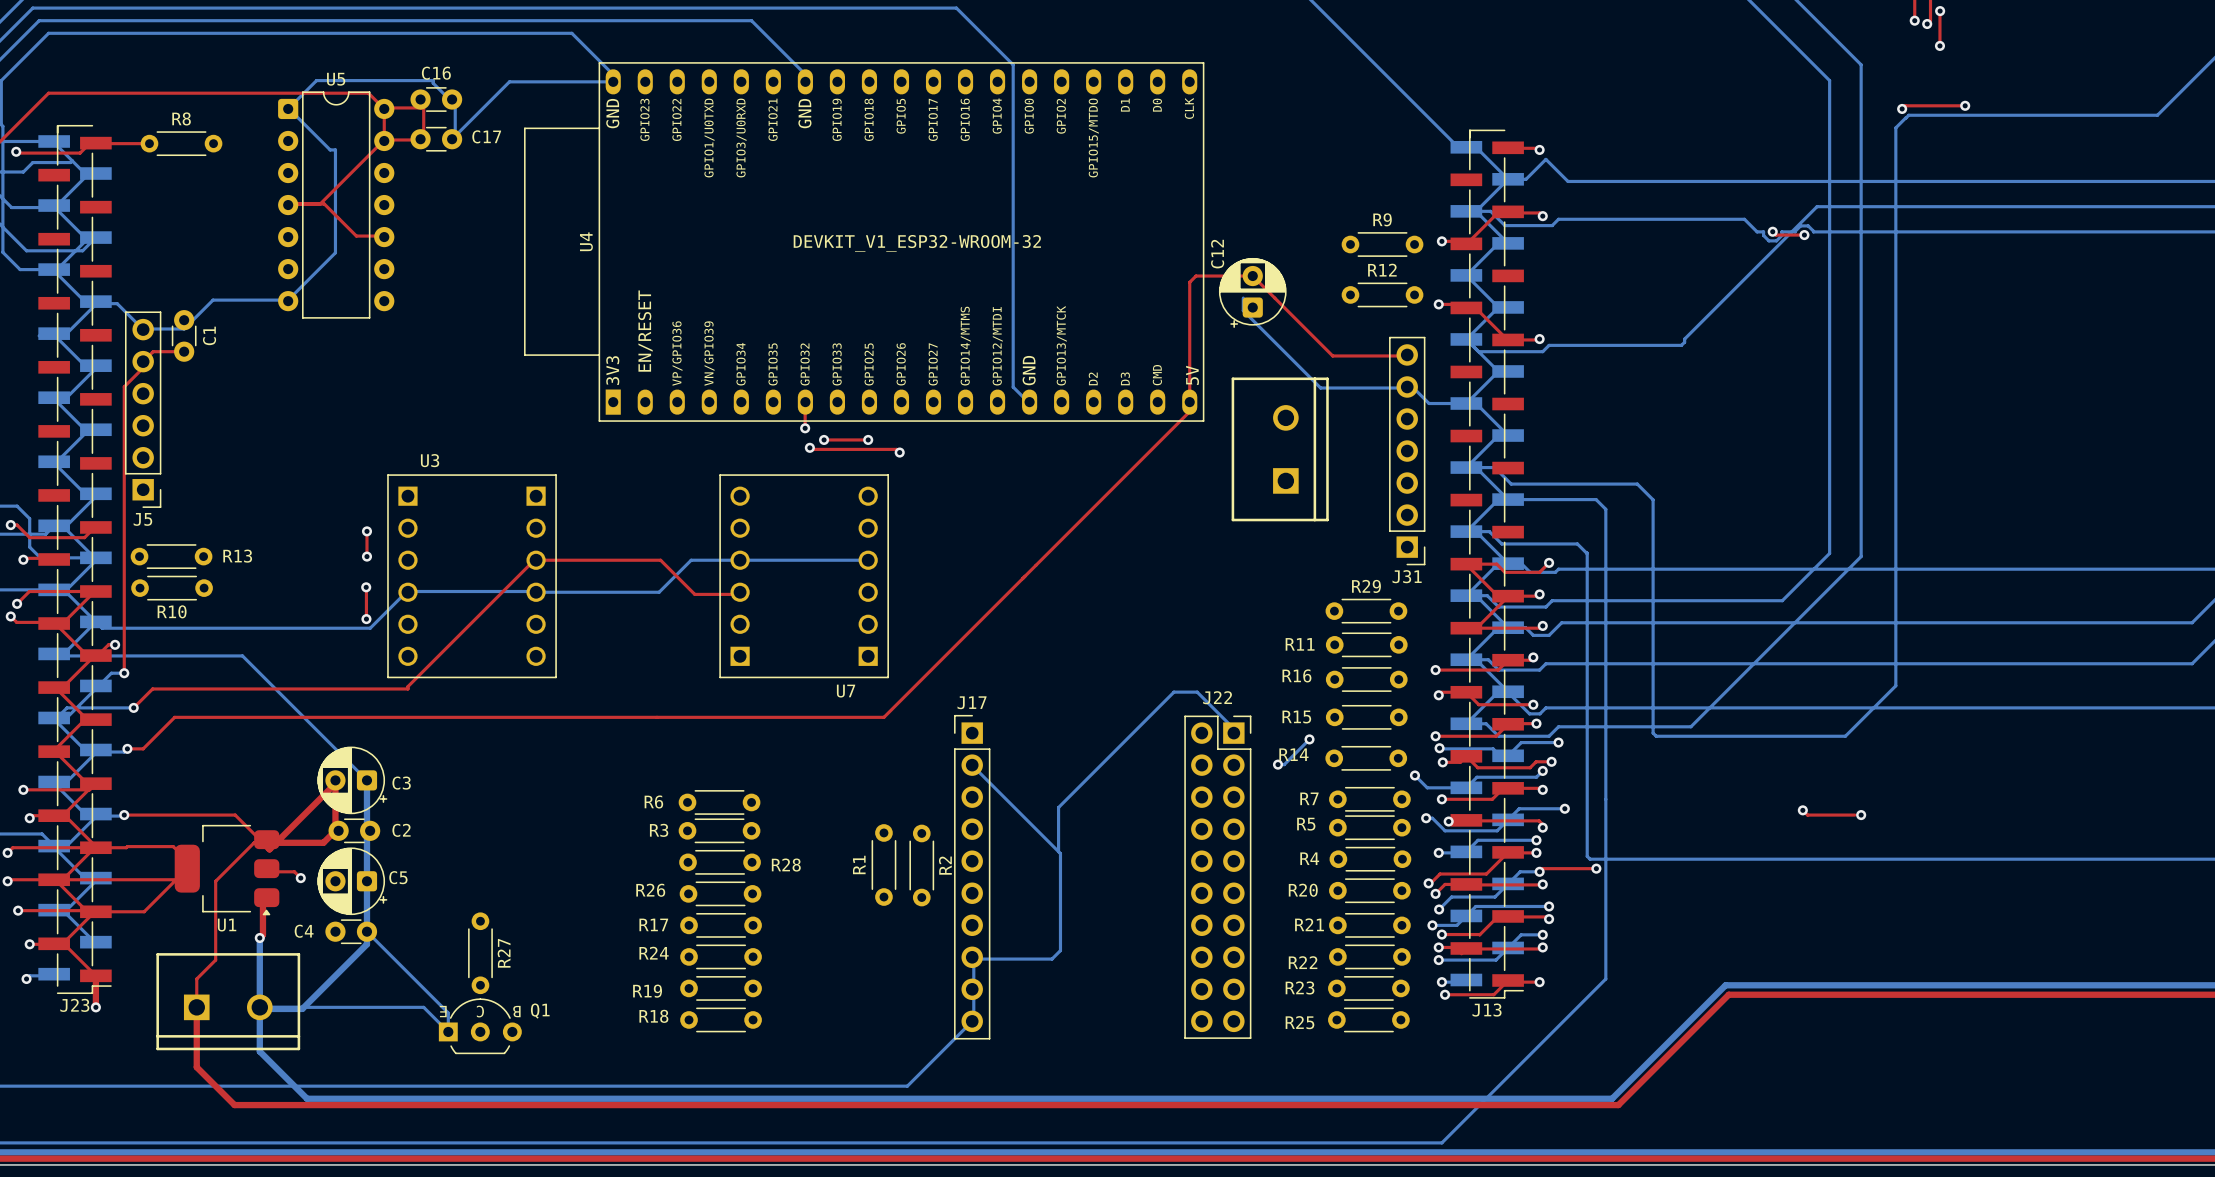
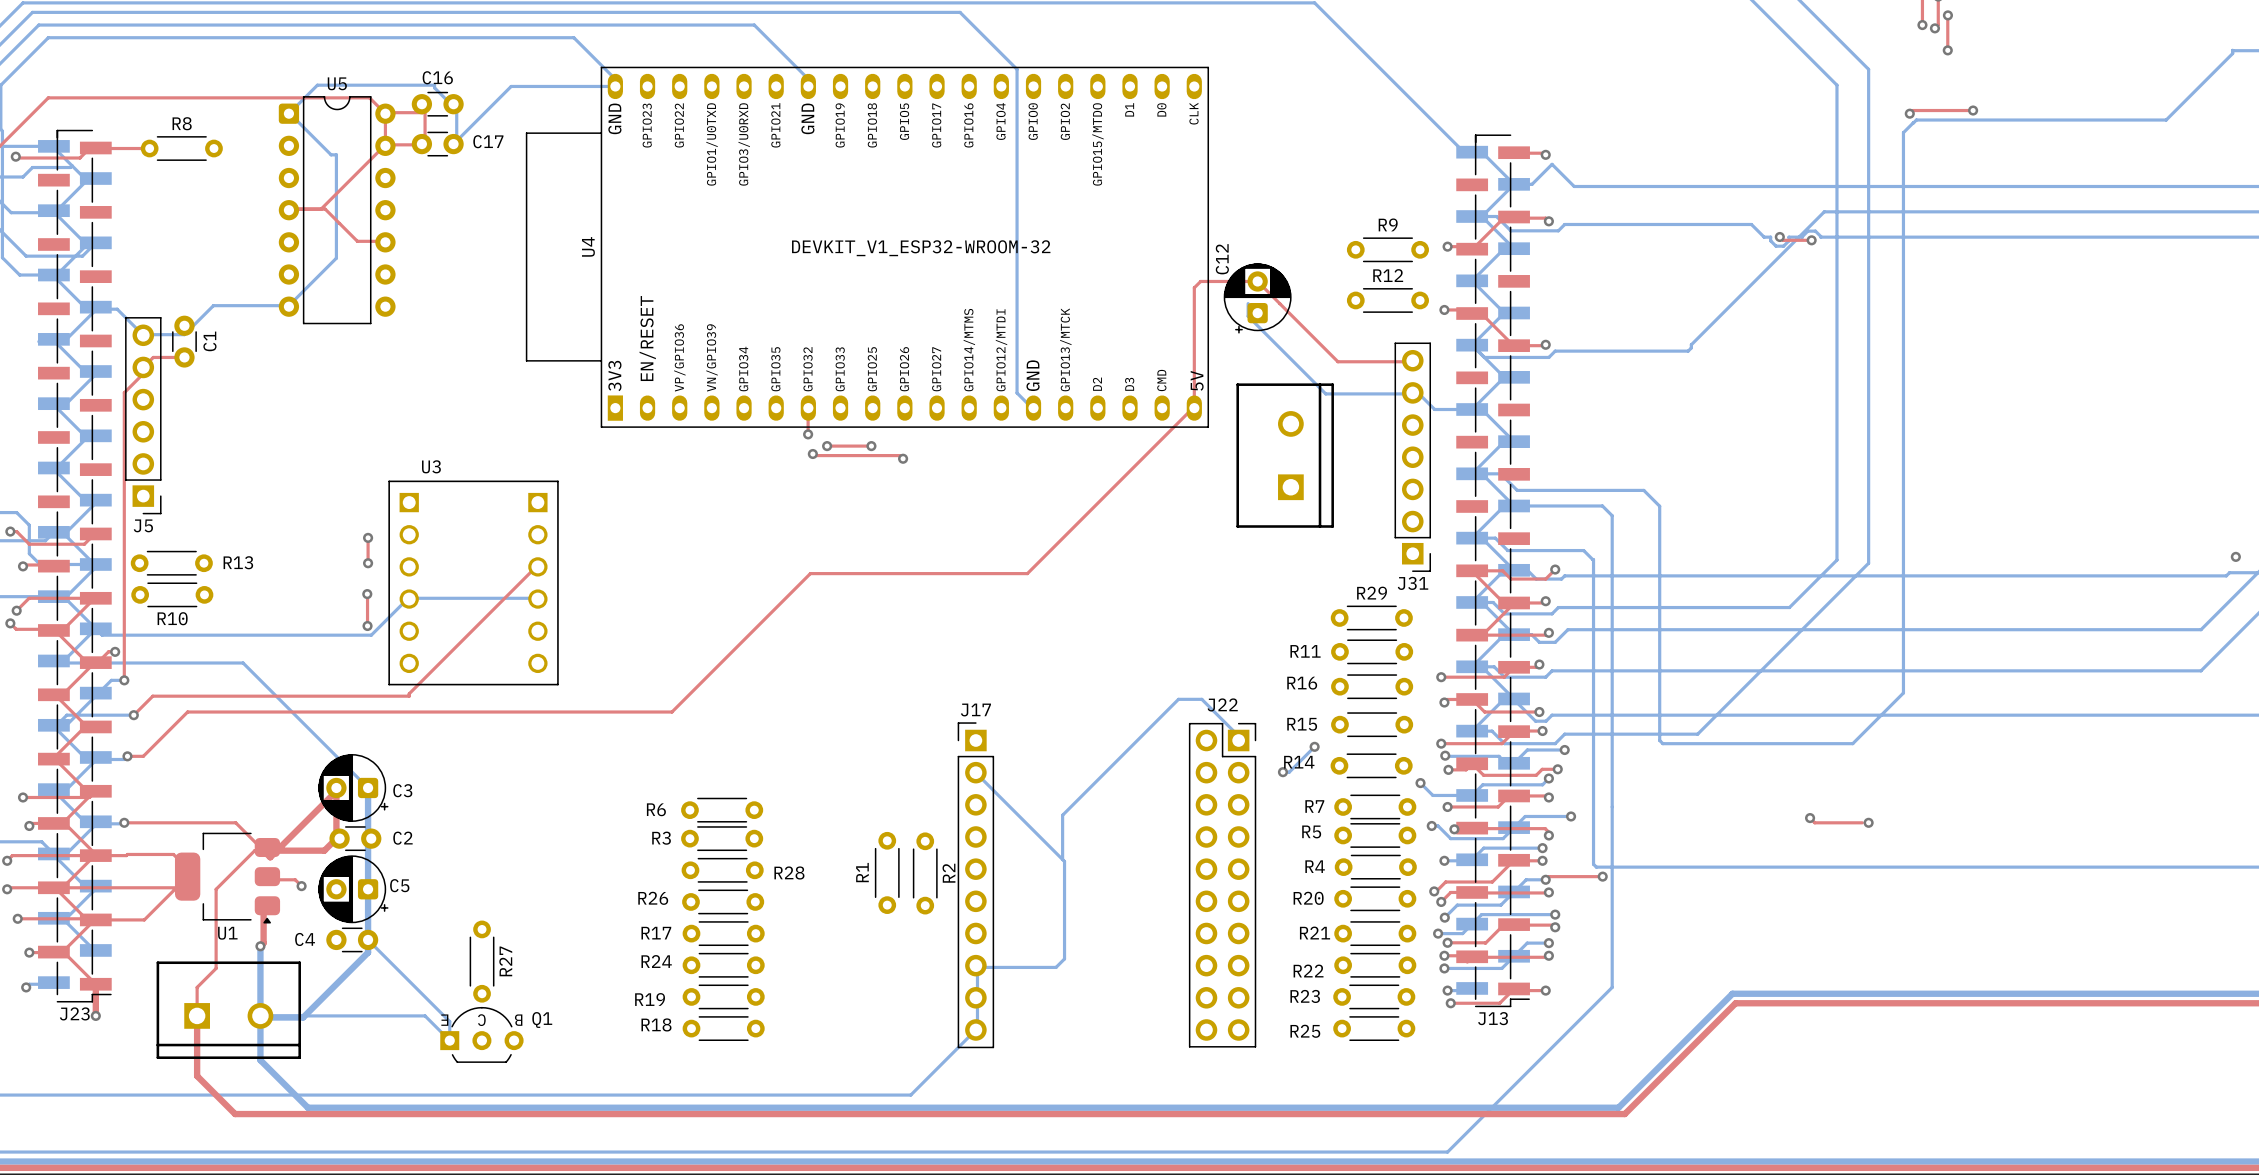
top track: (1188, 402) (1188, 412) (883, 717) (174, 717) -> (1192, 408) (1027, 573) (810, 573) (671, 712) (187, 712) (174, 724)
top track: (536, 560) (660, 560) (694, 594) (737, 594) (740, 592) -> none
bottom track: (868, 560) (691, 560) (659, 592) (536, 592) -> none
U7: (804, 576) -> none

